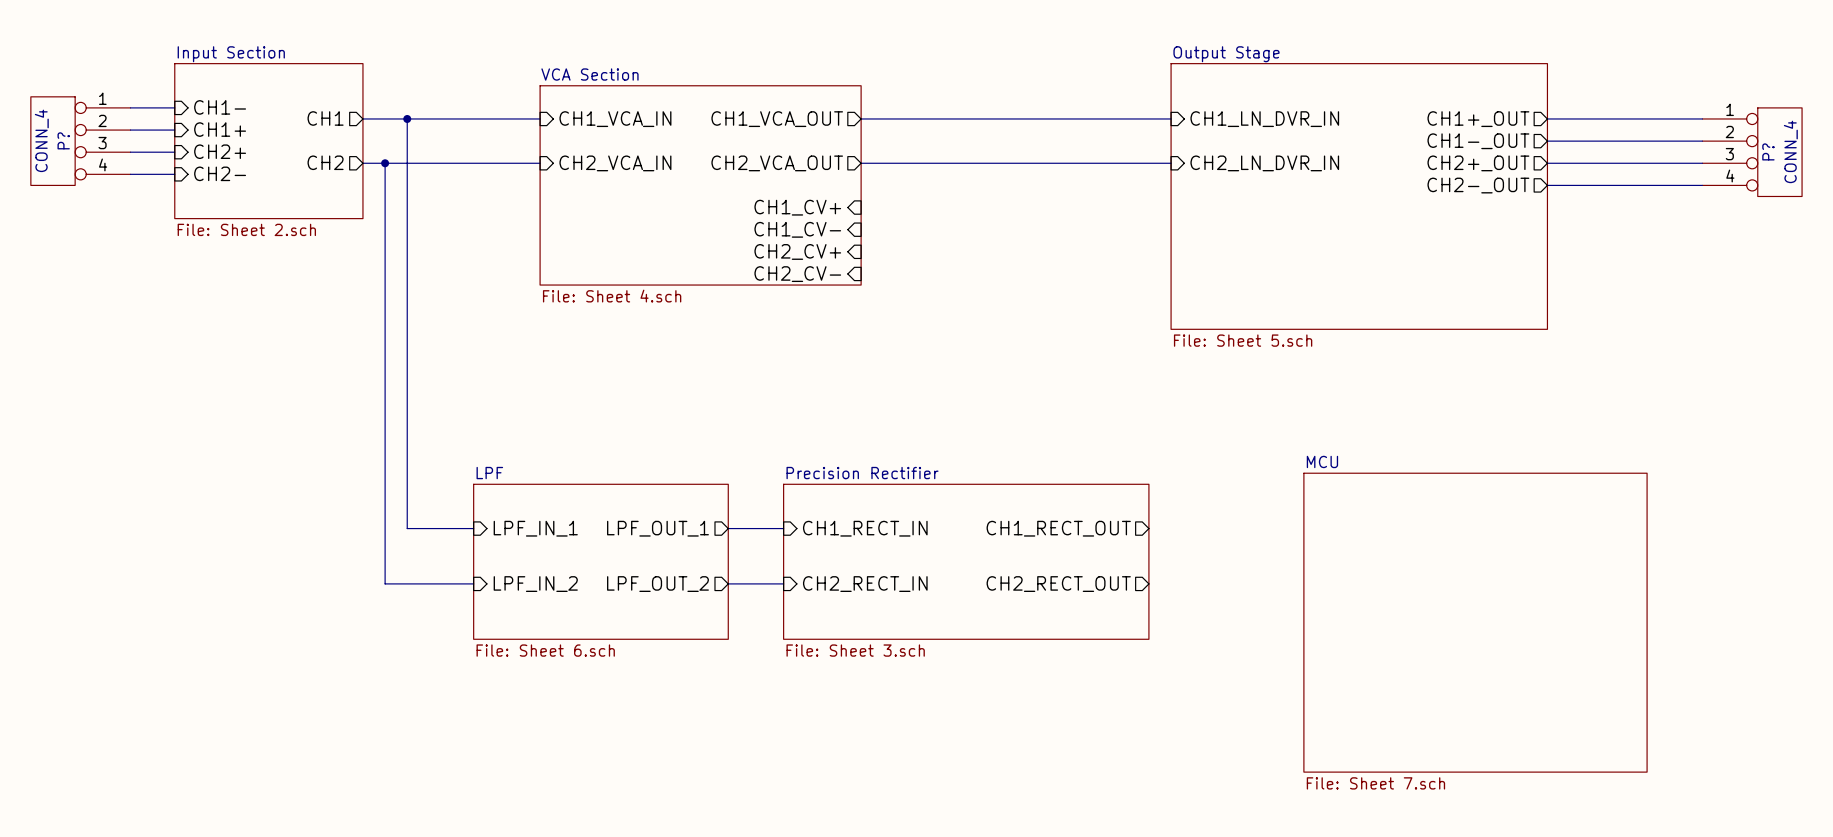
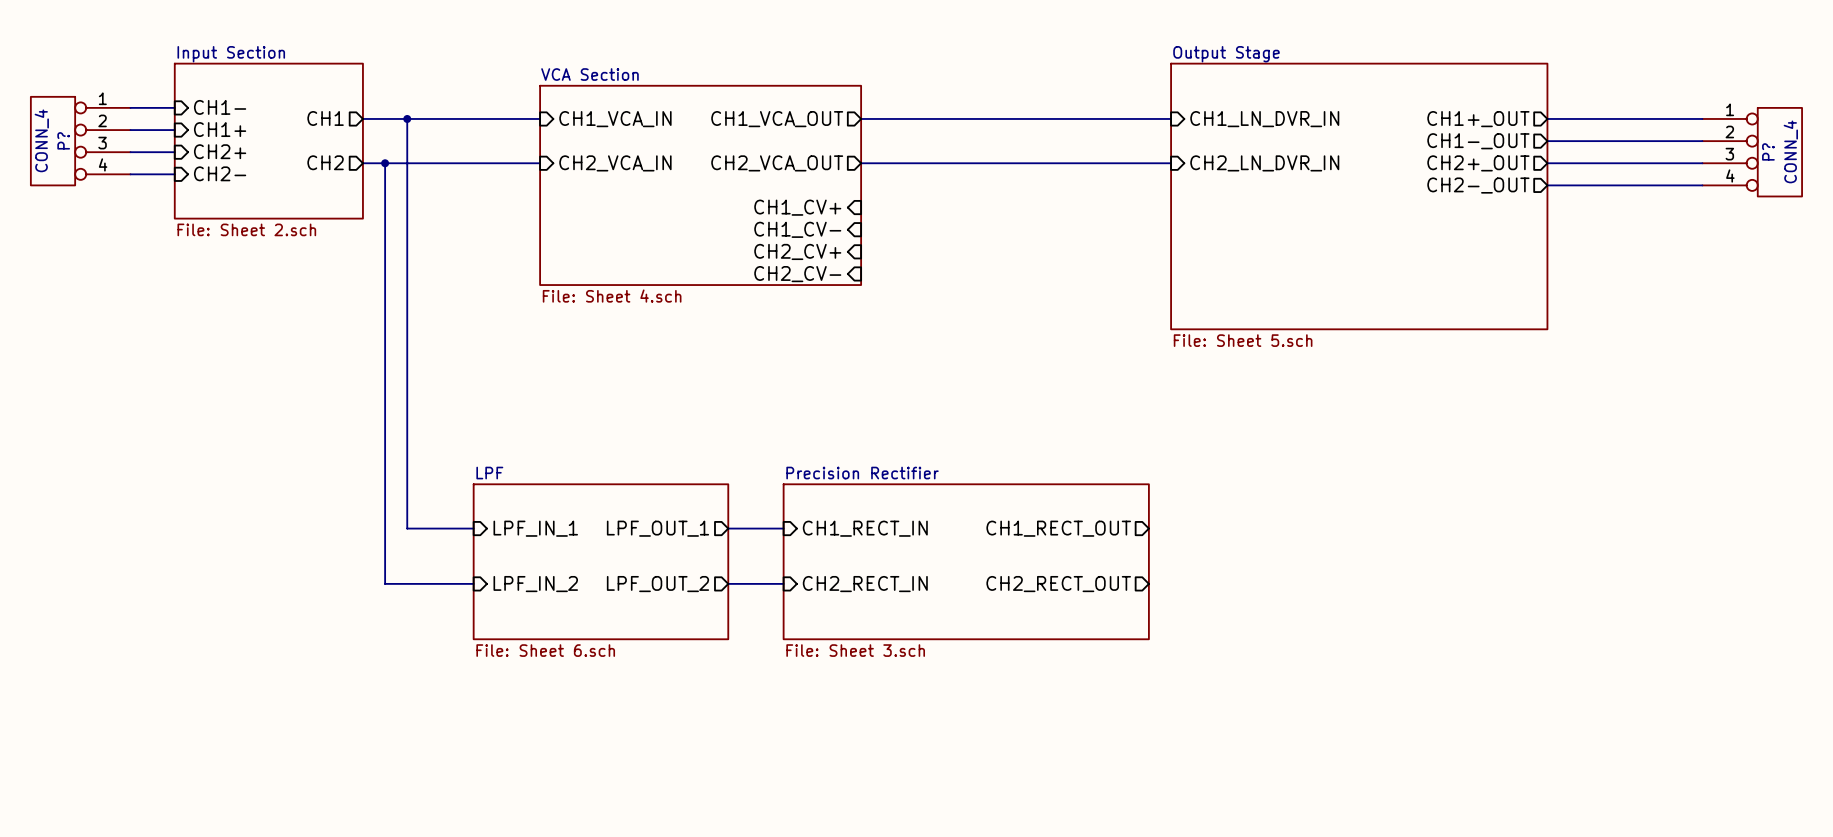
sheet MCU: File: Sheet 7.sch (1475, 622) -> none

